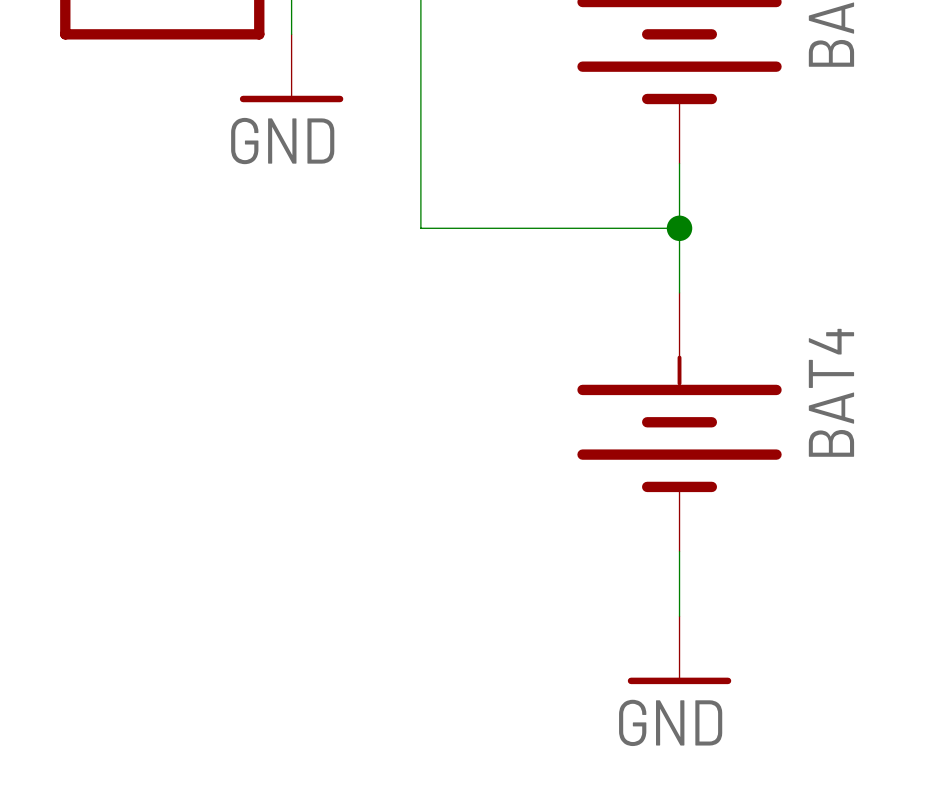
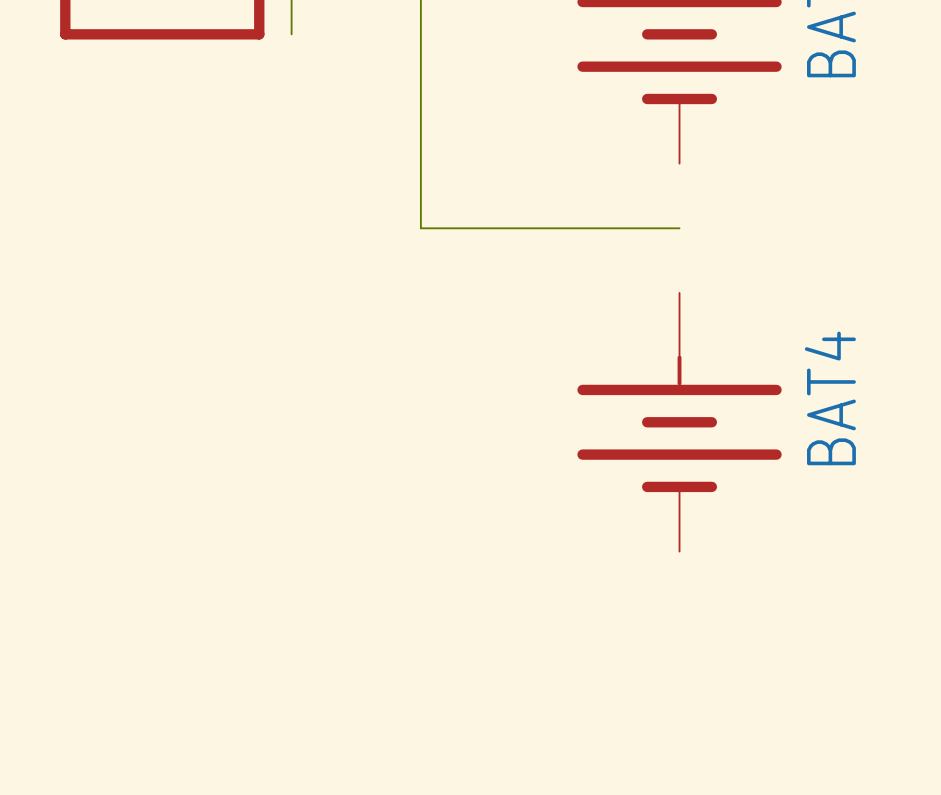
power symbol: GND (291, 68) -> none
wire: (679, 163) (679, 292) -> none
junction: (679, 228) -> none
wire: (679, 551) (679, 616) -> none
power symbol: GND (679, 650) -> none

